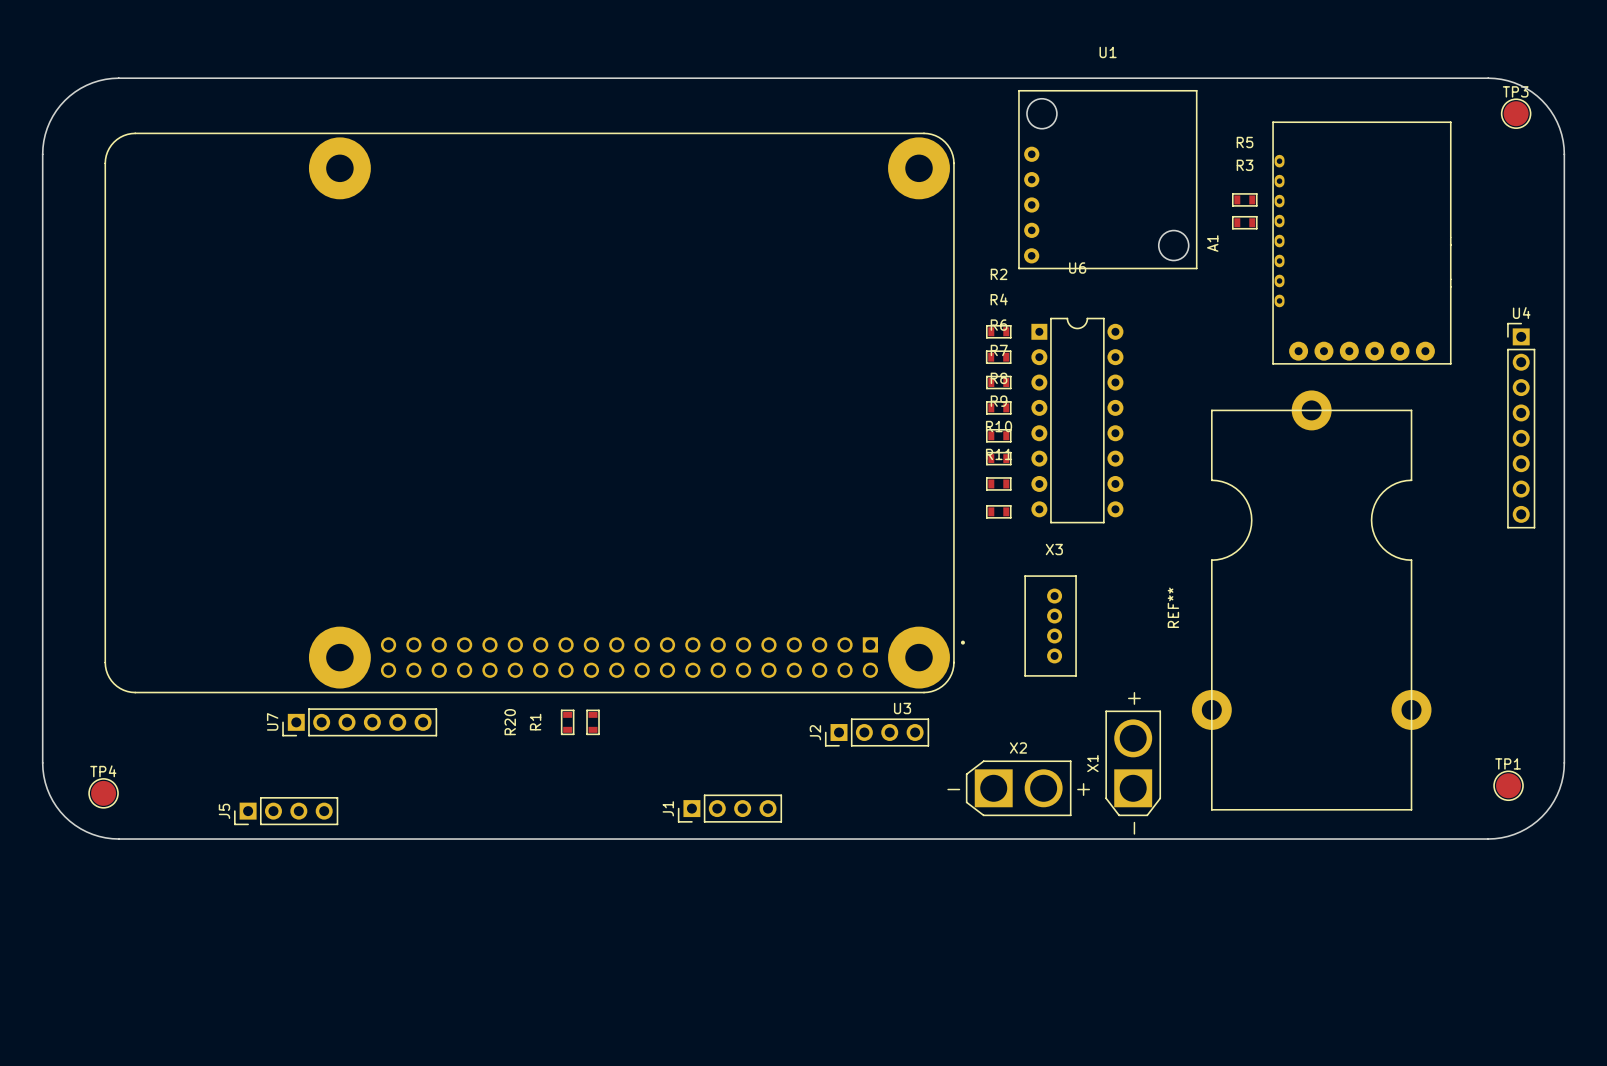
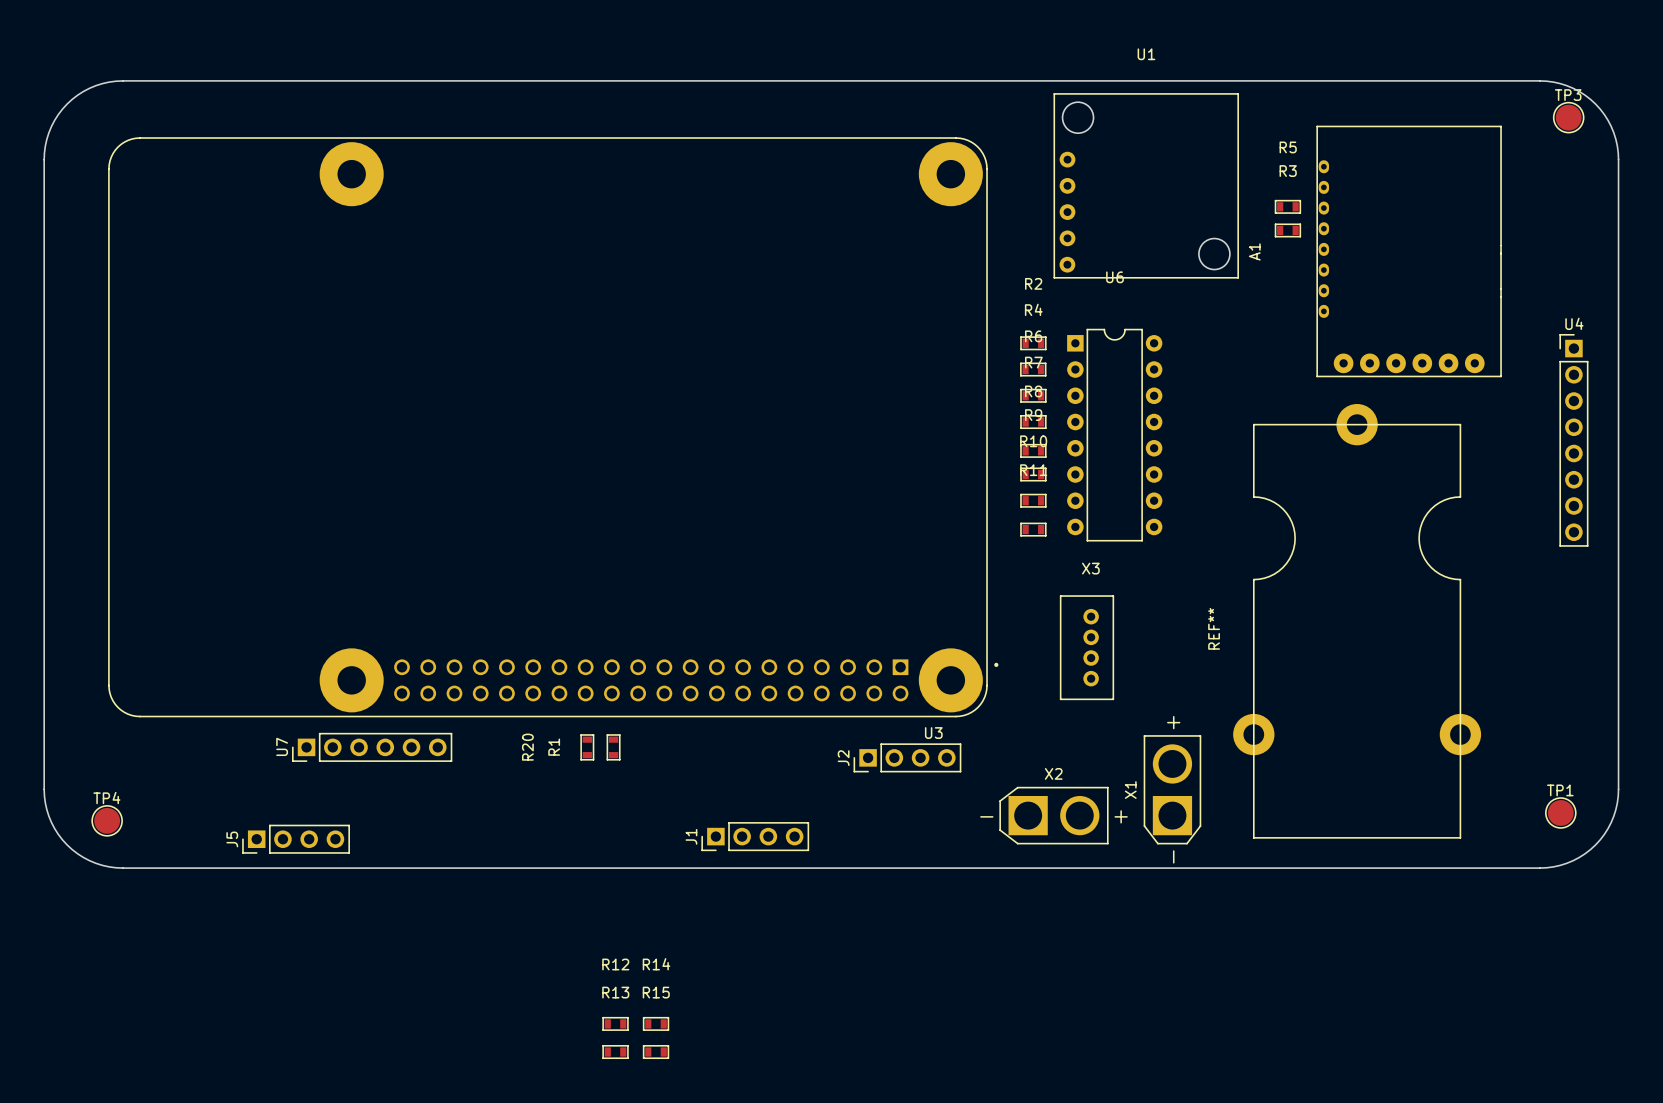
R12: none -> (615, 1023)
R14: none -> (656, 1023)
R13: none -> (615, 1052)
R15: none -> (656, 1052)

